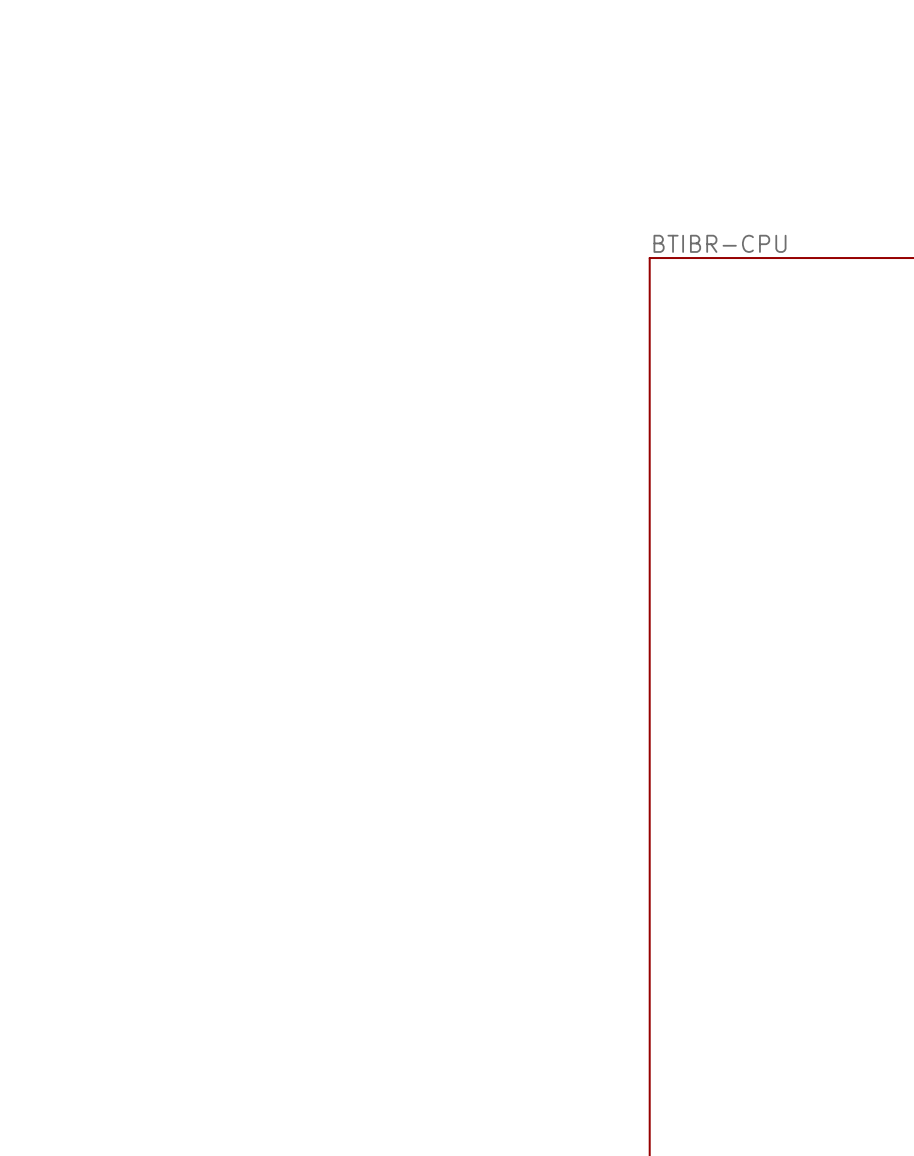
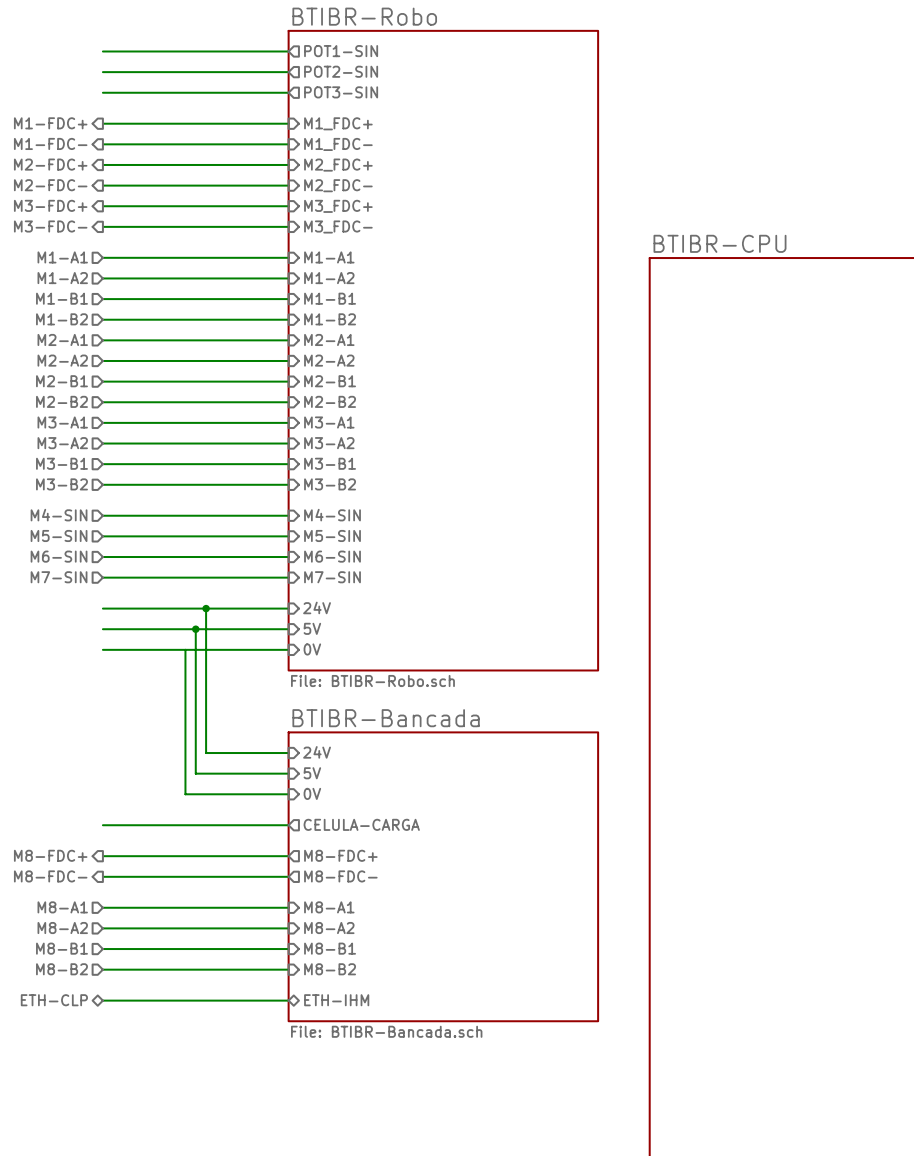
wire: none -> (102, 51) (288, 51)
sheet pin: none -> POT1-SIN (341, 51)
sheet pin: none -> POT2-SIN (341, 71)
wire: none -> (102, 72) (288, 72)
wire: none -> (102, 92) (288, 92)
sheet pin: none -> POT3-SIN (341, 92)
sheet pin: none -> M1-FDC+ (50, 123)
wire: none -> (102, 123) (288, 123)
sheet pin: none -> M1_FDC+ (338, 123)
sheet pin: none -> M1-FDC- (50, 143)
wire: none -> (102, 144) (288, 144)
sheet pin: none -> M1_FDC- (338, 144)
sheet pin: none -> M2-FDC+ (50, 164)
wire: none -> (102, 164) (288, 164)
sheet pin: none -> M2_FDC+ (338, 165)
sheet pin: none -> M2-FDC- (50, 185)
wire: none -> (102, 185) (288, 185)
sheet pin: none -> M2_FDC- (338, 185)
sheet pin: none -> M3-FDC+ (50, 205)
wire: none -> (102, 206) (288, 206)
sheet pin: none -> M3_FDC+ (338, 206)
sheet pin: none -> M3-FDC- (50, 226)
wire: none -> (102, 226) (288, 226)
sheet pin: none -> M3_FDC- (338, 226)
sheet pin: none -> M1-A1 (62, 257)
wire: none -> (102, 257) (288, 257)
sheet pin: none -> M1-A1 (329, 257)
sheet pin: none -> M1-A2 (62, 278)
wire: none -> (102, 278) (288, 278)
sheet pin: none -> M1-A2 (329, 278)
sheet pin: none -> M1-B1 (61, 298)
sheet pin: none -> M1-B1 (330, 298)
wire: none -> (102, 299) (288, 299)
sheet pin: none -> M1-B2 (61, 319)
wire: none -> (102, 319) (288, 319)
sheet pin: none -> M1-B2 (330, 319)
sheet pin: none -> M2-A1 (62, 339)
sheet pin: none -> M2-A1 (329, 339)
wire: none -> (102, 340) (288, 340)
sheet BTIBR-Robo: none -> File: BTIBR-Robo.sch (443, 350)
sheet pin: none -> M2-A2 (62, 360)
wire: none -> (102, 360) (288, 360)
sheet pin: none -> M2-A2 (329, 360)
sheet pin: none -> M2-B1 (61, 381)
wire: none -> (102, 381) (288, 381)
sheet pin: none -> M2-B1 (330, 381)
sheet pin: none -> M2-B2 (61, 401)
sheet pin: none -> M2-B2 (330, 401)
wire: none -> (102, 402) (288, 402)
sheet pin: none -> M3-A1 (62, 422)
wire: none -> (102, 422) (288, 422)
sheet pin: none -> M3-A1 (329, 422)
sheet pin: none -> M3-A2 (62, 443)
wire: none -> (102, 443) (288, 443)
sheet pin: none -> M3-A2 (329, 443)
sheet pin: none -> M3-B1 (61, 463)
sheet pin: none -> M3-B1 (330, 463)
wire: none -> (102, 464) (288, 464)
sheet pin: none -> M3-B2 (61, 484)
wire: none -> (102, 484) (288, 484)
sheet pin: none -> M3-B2 (330, 484)
sheet pin: none -> M4-SIN (59, 515)
wire: none -> (102, 515) (288, 515)
sheet pin: none -> M4-SIN (332, 515)
sheet pin: none -> M5-SIN (59, 535)
sheet pin: none -> M5-SIN (332, 535)
wire: none -> (102, 536) (288, 536)
sheet pin: none -> M6-SIN (59, 556)
sheet pin: none -> M6-SIN (332, 556)
wire: none -> (102, 557) (288, 557)
sheet pin: none -> M7-SIN (59, 577)
wire: none -> (102, 577) (288, 577)
sheet pin: none -> M7-SIN (332, 577)
sheet pin: none -> 24V (317, 607)
wire: none -> (102, 608) (288, 608)
wire: none -> (206, 608) (206, 753) (288, 753)
junction: none -> (206, 608)
sheet pin: none -> 5V (312, 628)
wire: none -> (102, 629) (288, 629)
wire: none -> (195, 629) (195, 773) (288, 773)
junction: none -> (195, 629)
wire: none -> (102, 649) (288, 649)
wire: none -> (185, 649) (185, 794) (288, 794)
sheet pin: none -> 0V (312, 649)
sheet pin: none -> 24V (317, 752)
sheet pin: none -> 5V (312, 773)
sheet pin: none -> 0V (312, 793)
sheet pin: none -> CELULA-CARGA (361, 824)
wire: none -> (102, 825) (288, 825)
sheet pin: none -> M8-FDC+ (50, 855)
sheet pin: none -> M8-FDC+ (340, 855)
wire: none -> (102, 856) (288, 856)
sheet pin: none -> M8-FDC- (50, 876)
wire: none -> (102, 876) (288, 876)
sheet pin: none -> M8-FDC- (340, 876)
sheet BTIBR-Bancada: none -> File: BTIBR-Bancada.sch (443, 876)
sheet pin: none -> M8-A1 (62, 907)
wire: none -> (102, 907) (288, 907)
sheet pin: none -> M8-A1 (329, 907)
sheet pin: none -> M8-A2 (62, 928)
wire: none -> (102, 928) (288, 928)
sheet pin: none -> M8-A2 (329, 928)
sheet pin: none -> M8-B1 (61, 948)
sheet pin: none -> M8-B1 (330, 948)
wire: none -> (102, 949) (288, 949)
sheet pin: none -> M8-B2 (61, 969)
wire: none -> (102, 969) (288, 969)
sheet pin: none -> M8-B2 (330, 969)
sheet pin: none -> ETH-CLP (54, 1000)
wire: none -> (102, 1000) (288, 1000)
sheet pin: none -> ETH-IHM (336, 1000)

